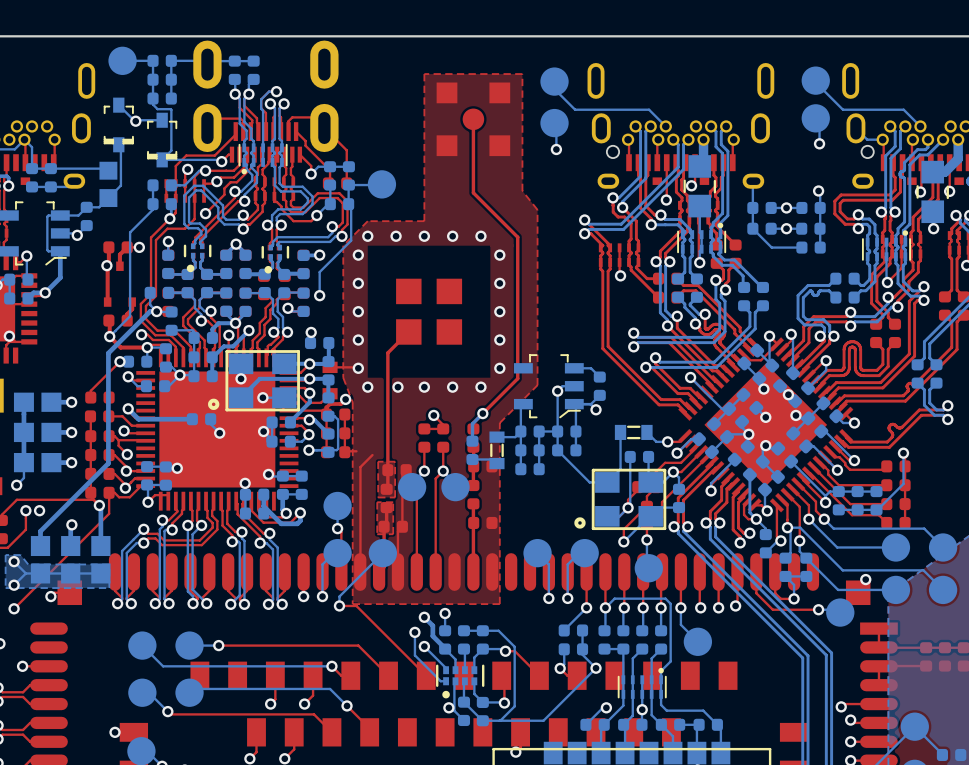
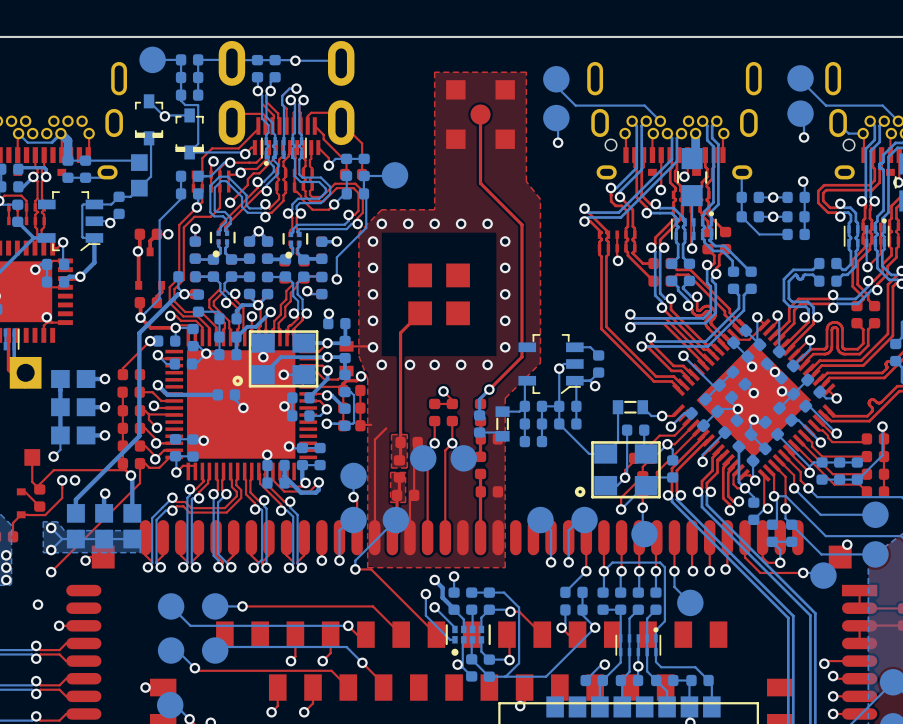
bottom track: none -> (275, 60) (338, 60)
via: none -> (295, 60)
bottom track width: thin (14, 149) (24, 139) (32, 147) (32, 168) -> thick (51, 142) (60, 133) (67, 140) (67, 160)

